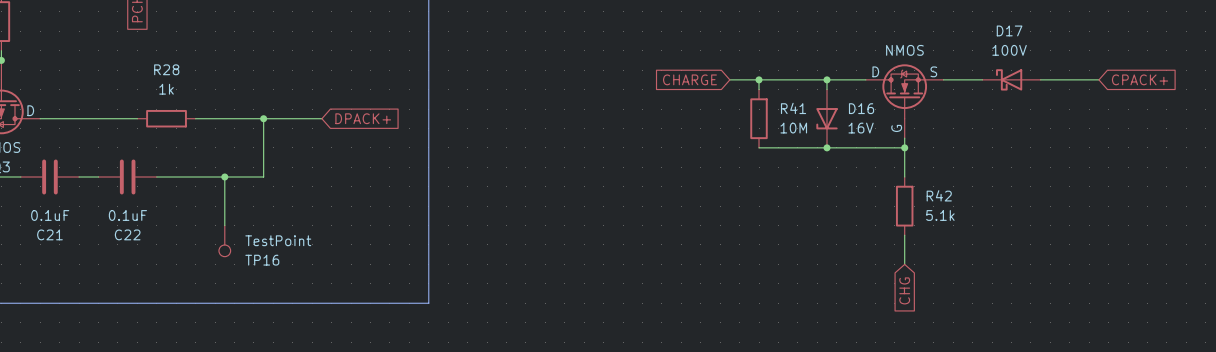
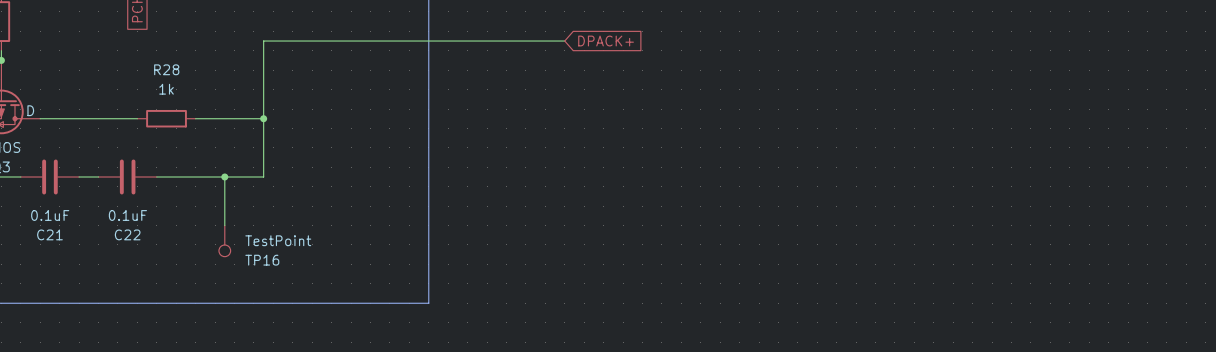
global label: none -> DPACK+ (606, 41)
global label: CHARGE (689, 79) -> none
wire: (729, 79) (865, 79) -> none
wire: (759, 79) (759, 89) -> none
junction: (759, 79) -> none
wire: (826, 79) (826, 89) -> none
junction: (826, 79) -> none
wire: (943, 79) (982, 79) -> none
D17: 100V (1011, 79) -> none
wire: (1040, 79) (1098, 79) -> none
global label: CPACK+ (1140, 79) -> none
part: NMOS (904, 101) -> none
wire: (263, 118) (321, 118) -> (263, 118) (263, 41) (564, 41)
global label: DPACK+ (363, 118) -> none
R41: 10M (759, 118) -> none
D16: 16V (826, 118) -> none
wire: (904, 138) (904, 177) -> none
wire: (759, 147) (904, 147) -> none
junction: (826, 147) -> none
junction: (904, 147) -> none
R42: 5.1k (904, 206) -> none
wire: (904, 235) (904, 264) -> none
global label: CHG (904, 290) -> none

